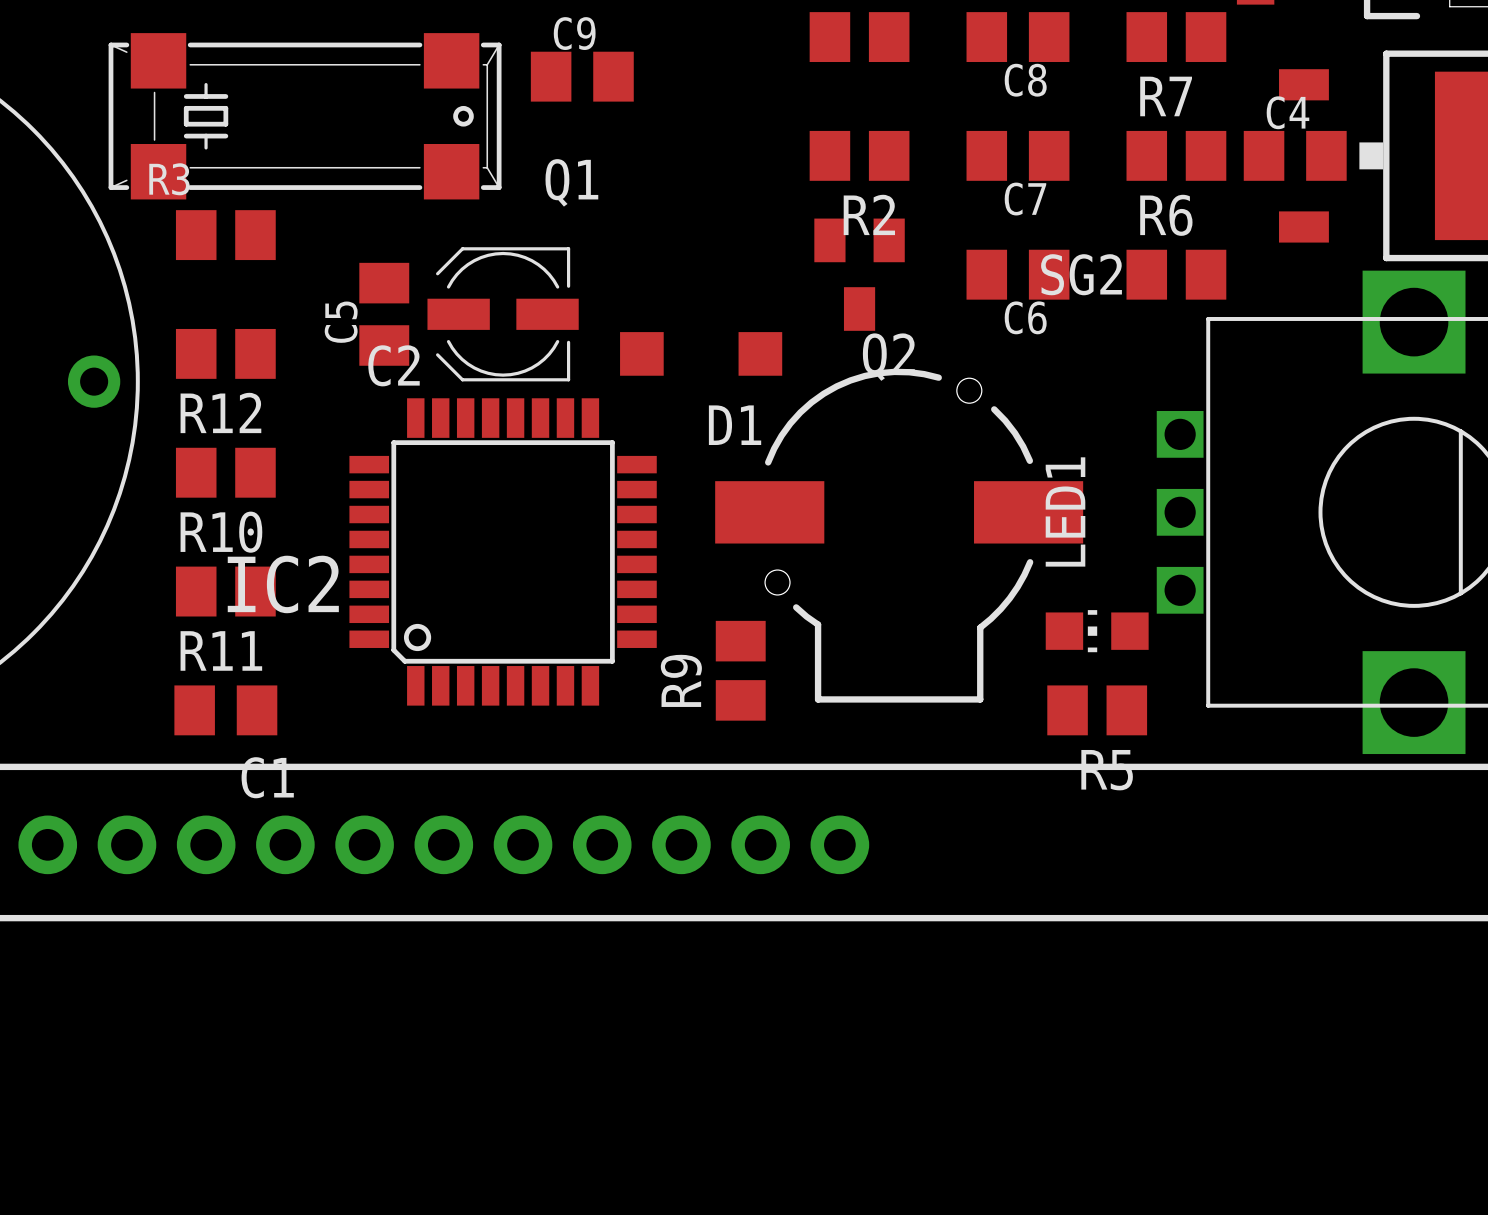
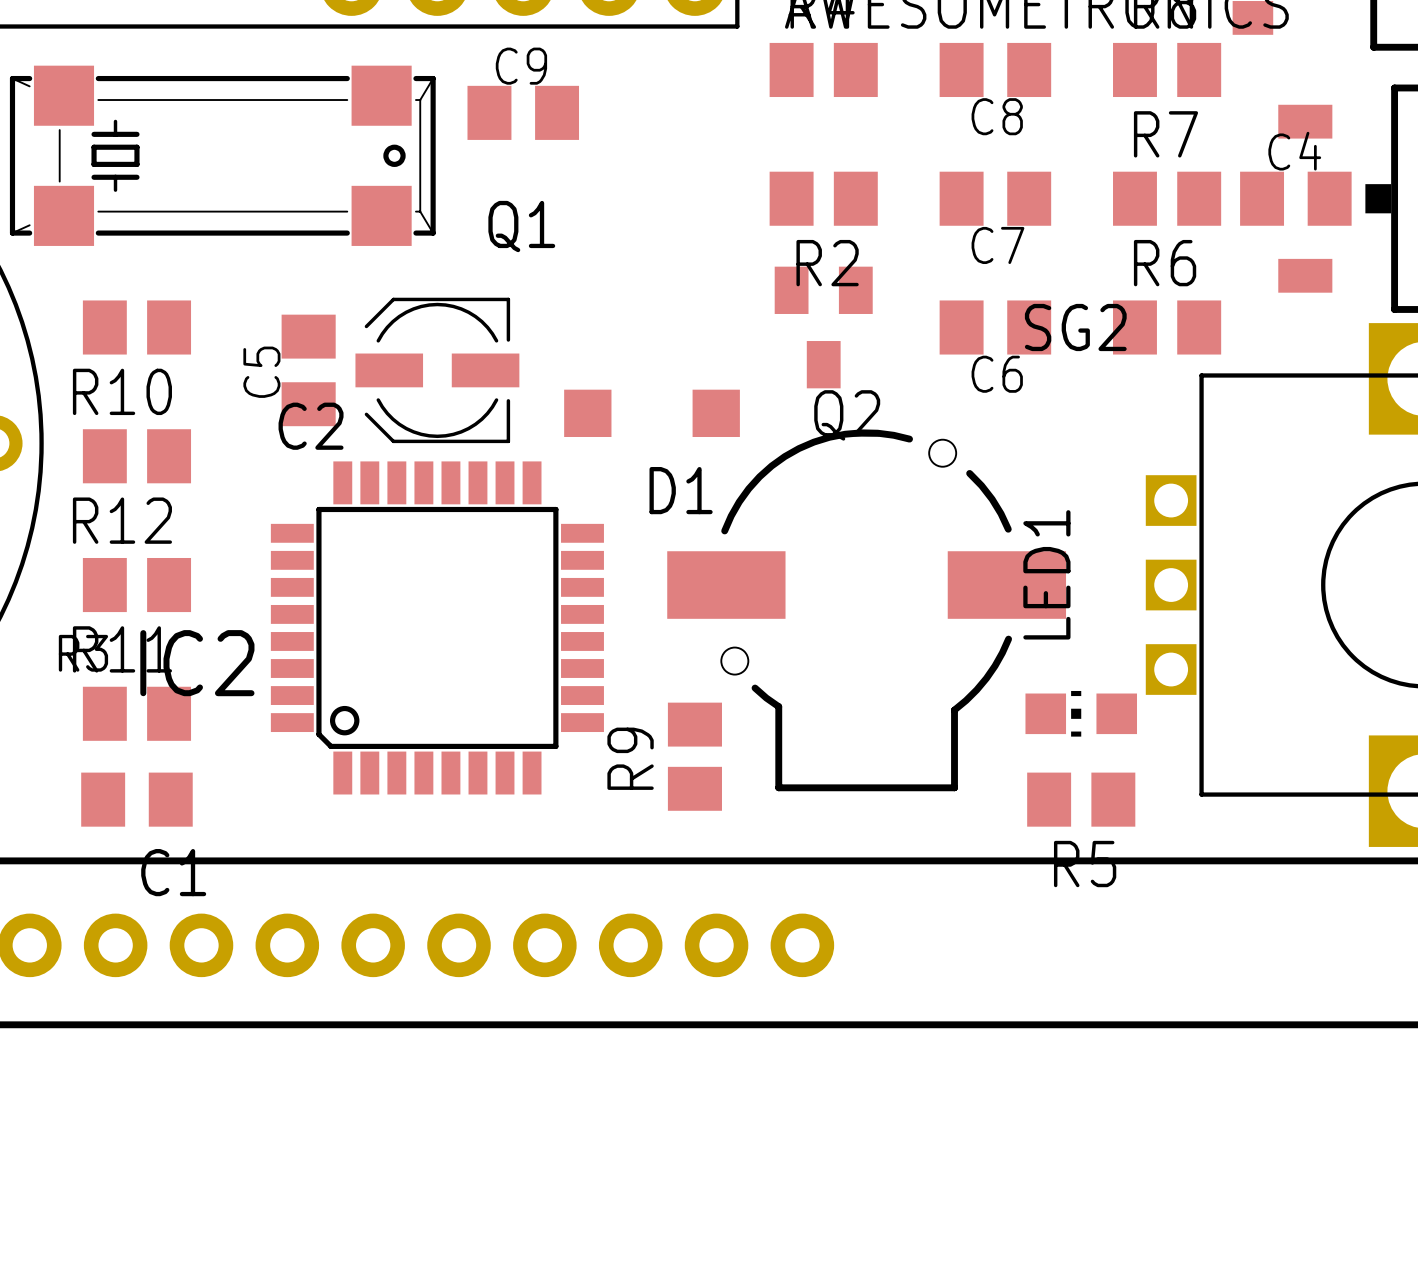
R3 position: (225, 235) -> (136, 713)
R12 position: (225, 353) -> (136, 456)
R10 position: (225, 472) -> (136, 327)
R11 position: (225, 591) -> (136, 585)

